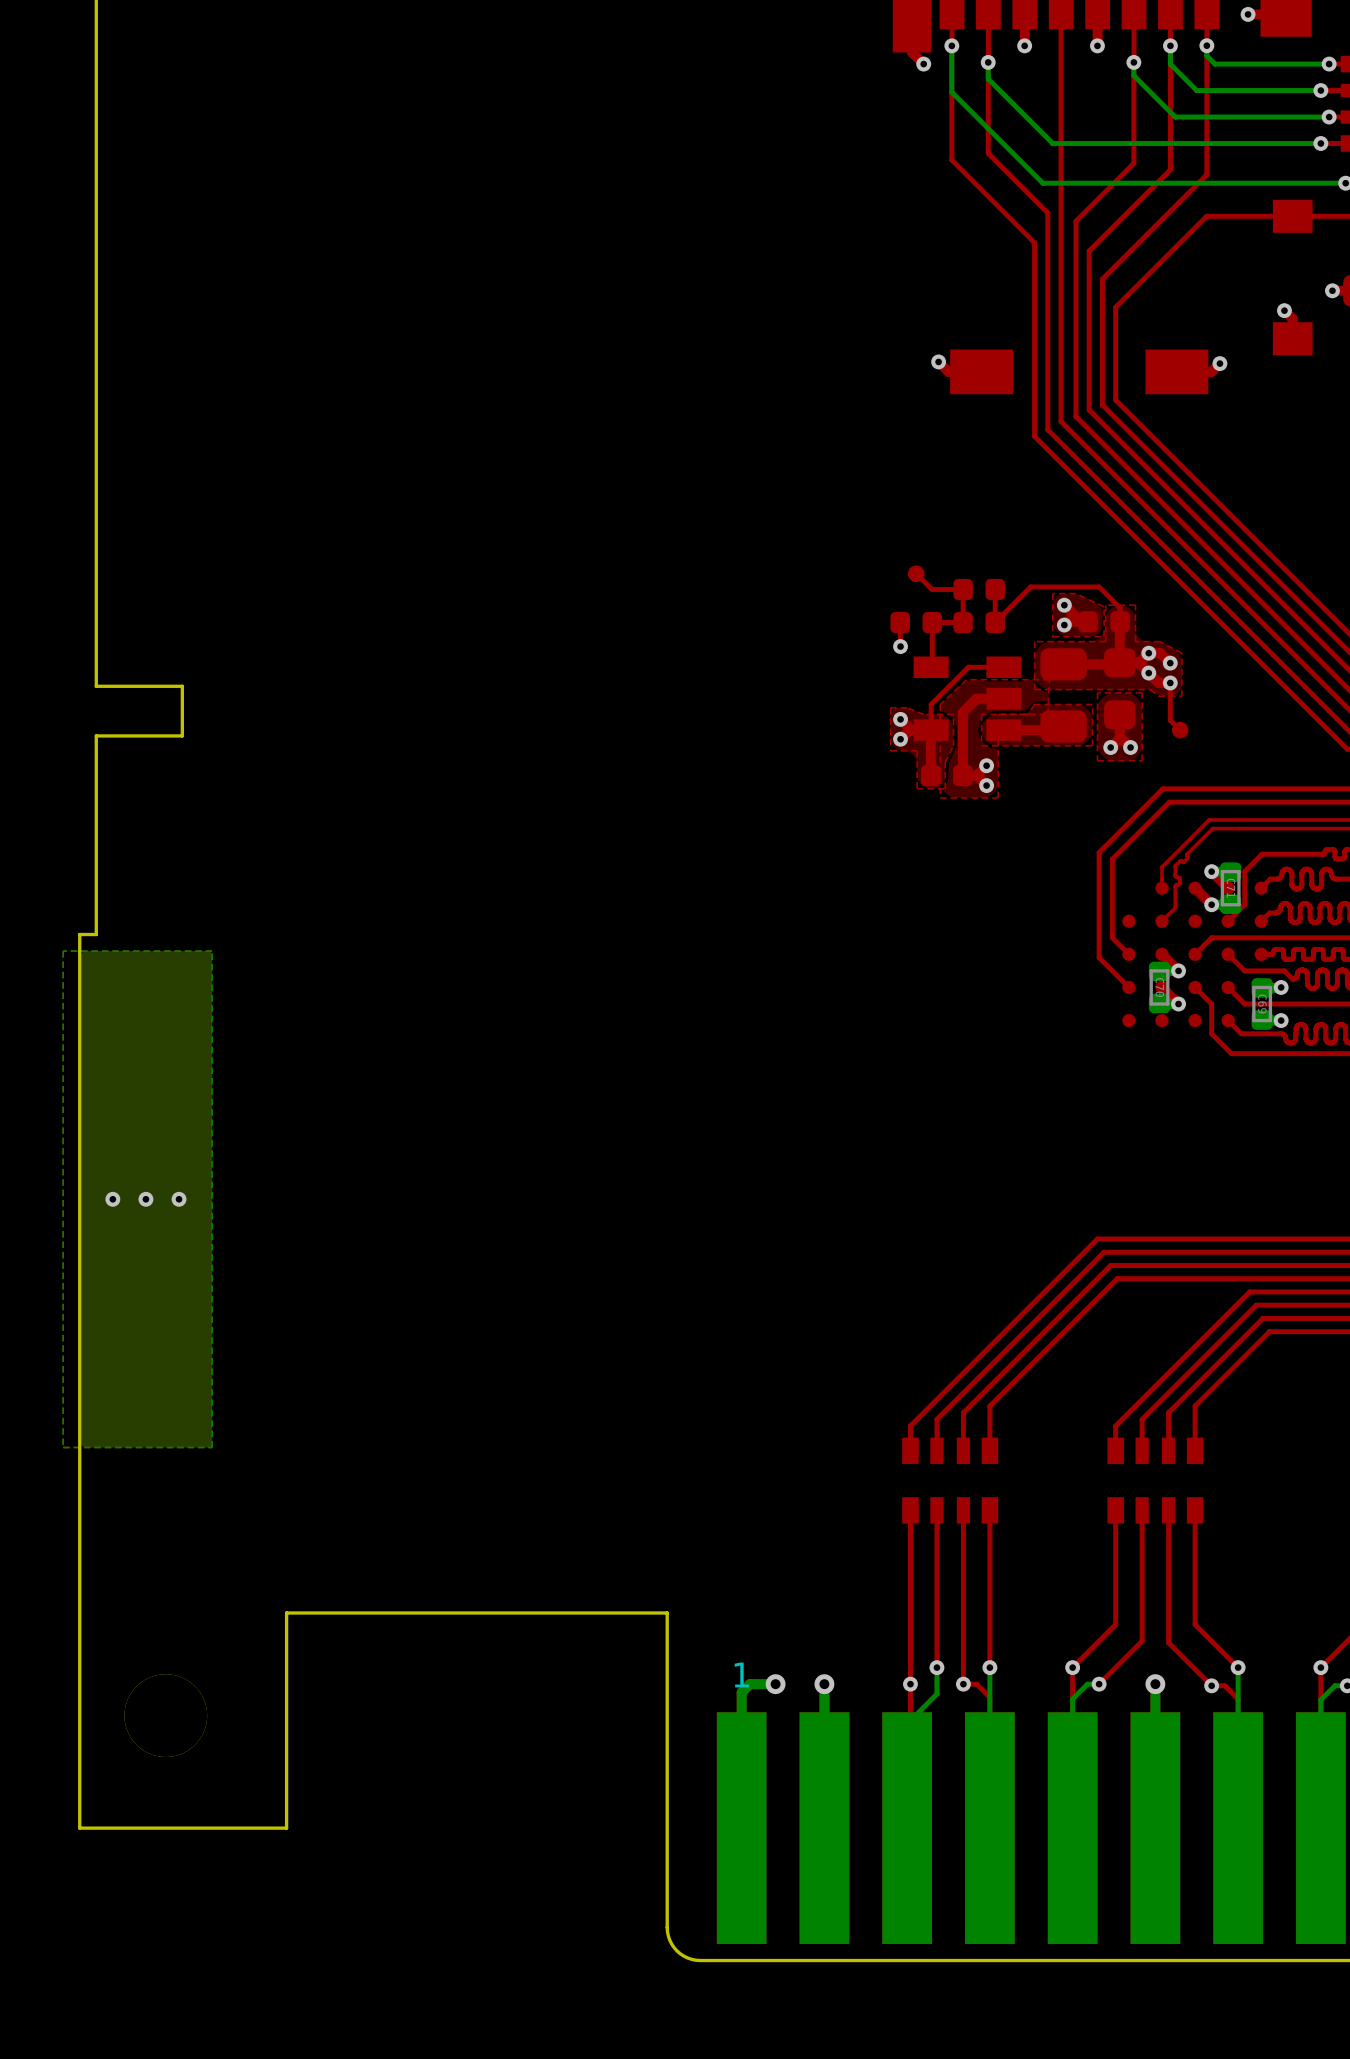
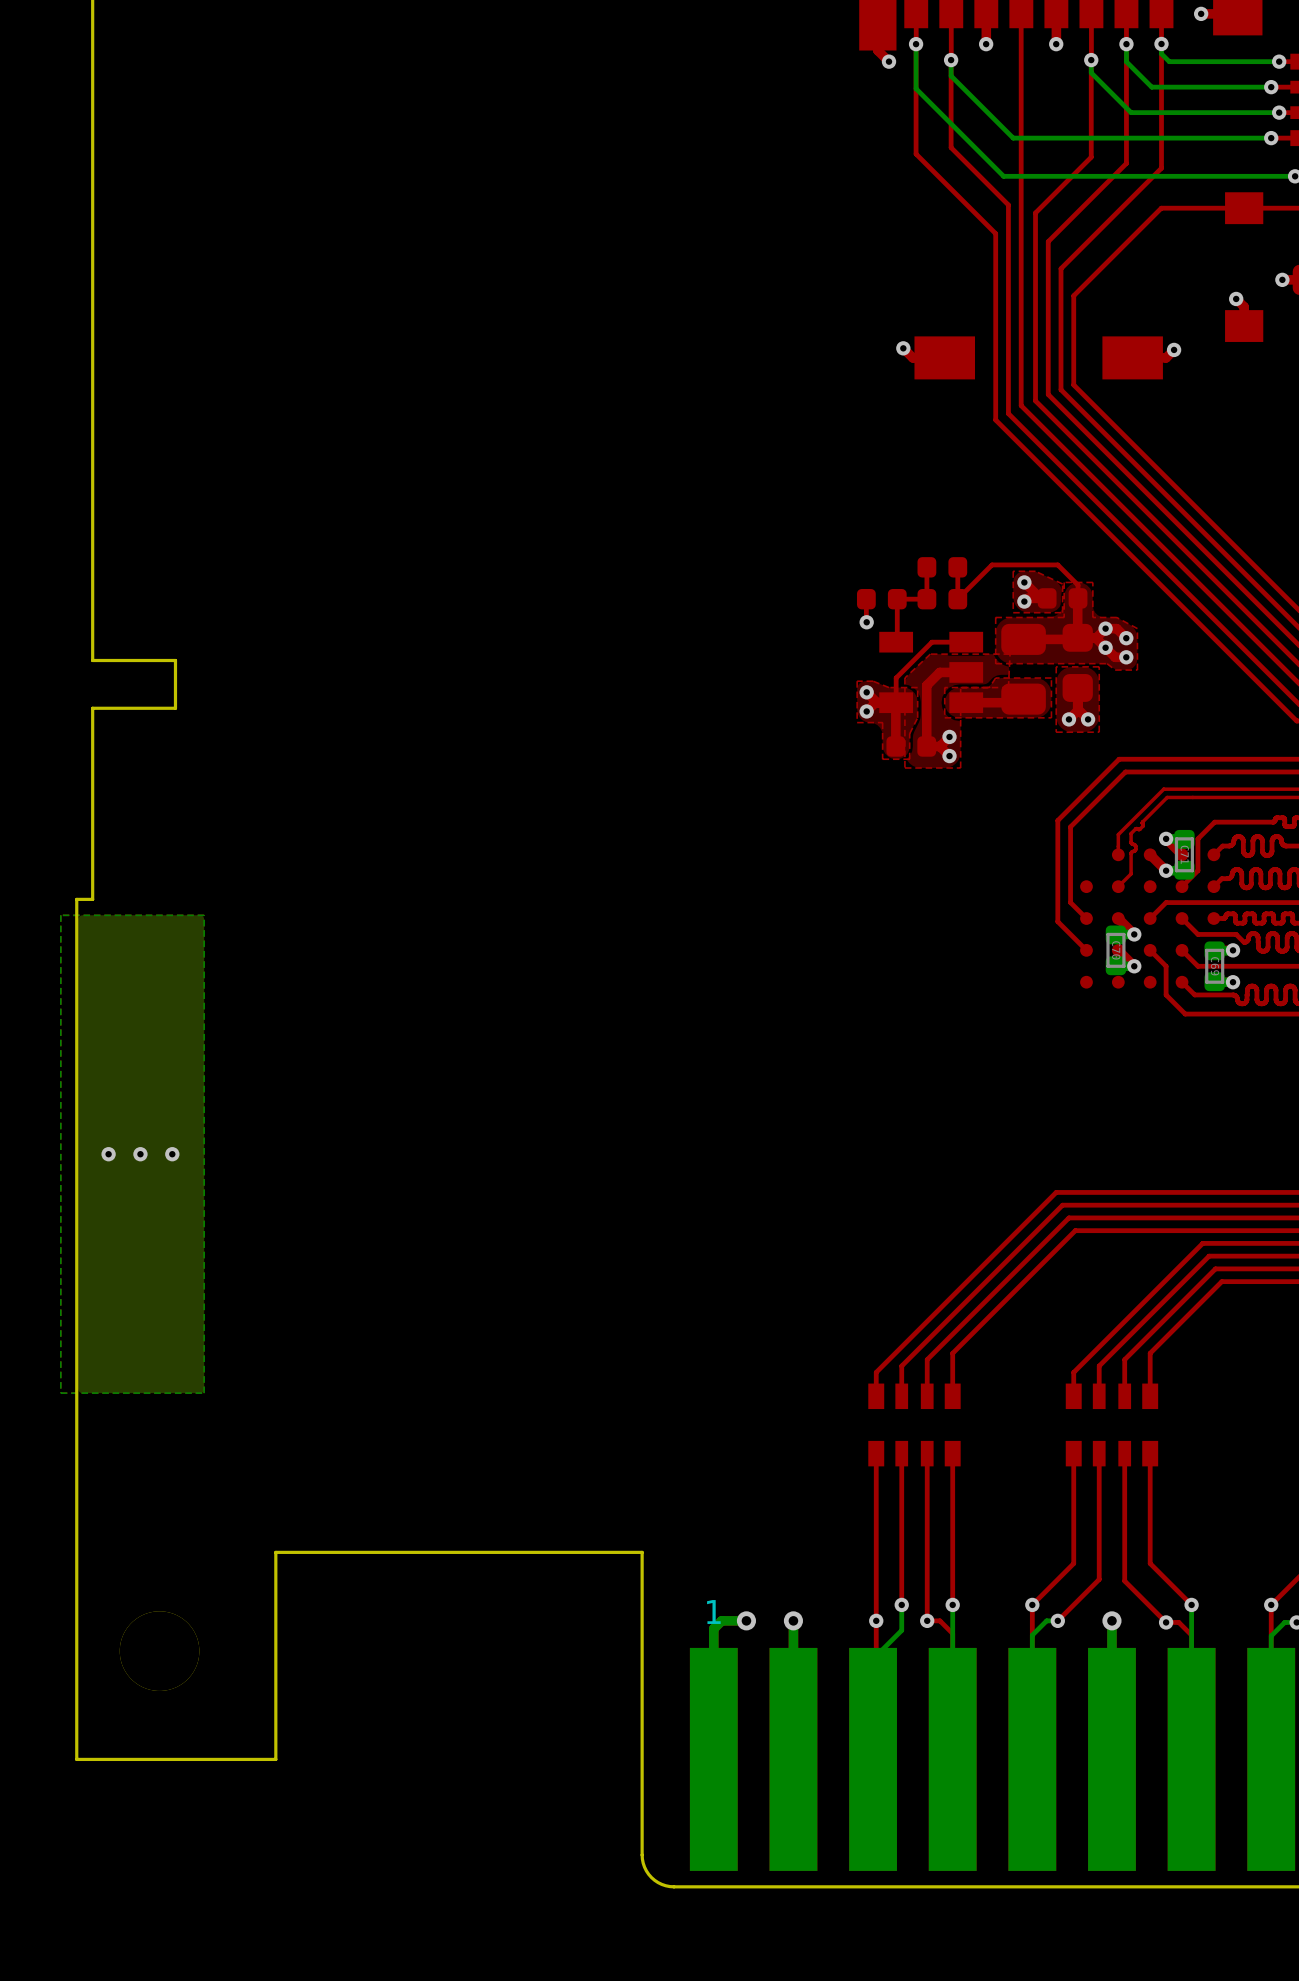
top track: (916, 573) (931, 589) (963, 589) -> none
part: (916, 573) -> none
top track: (1170, 682) (1170, 720) (1180, 730) -> none
part: (1180, 730) -> none

